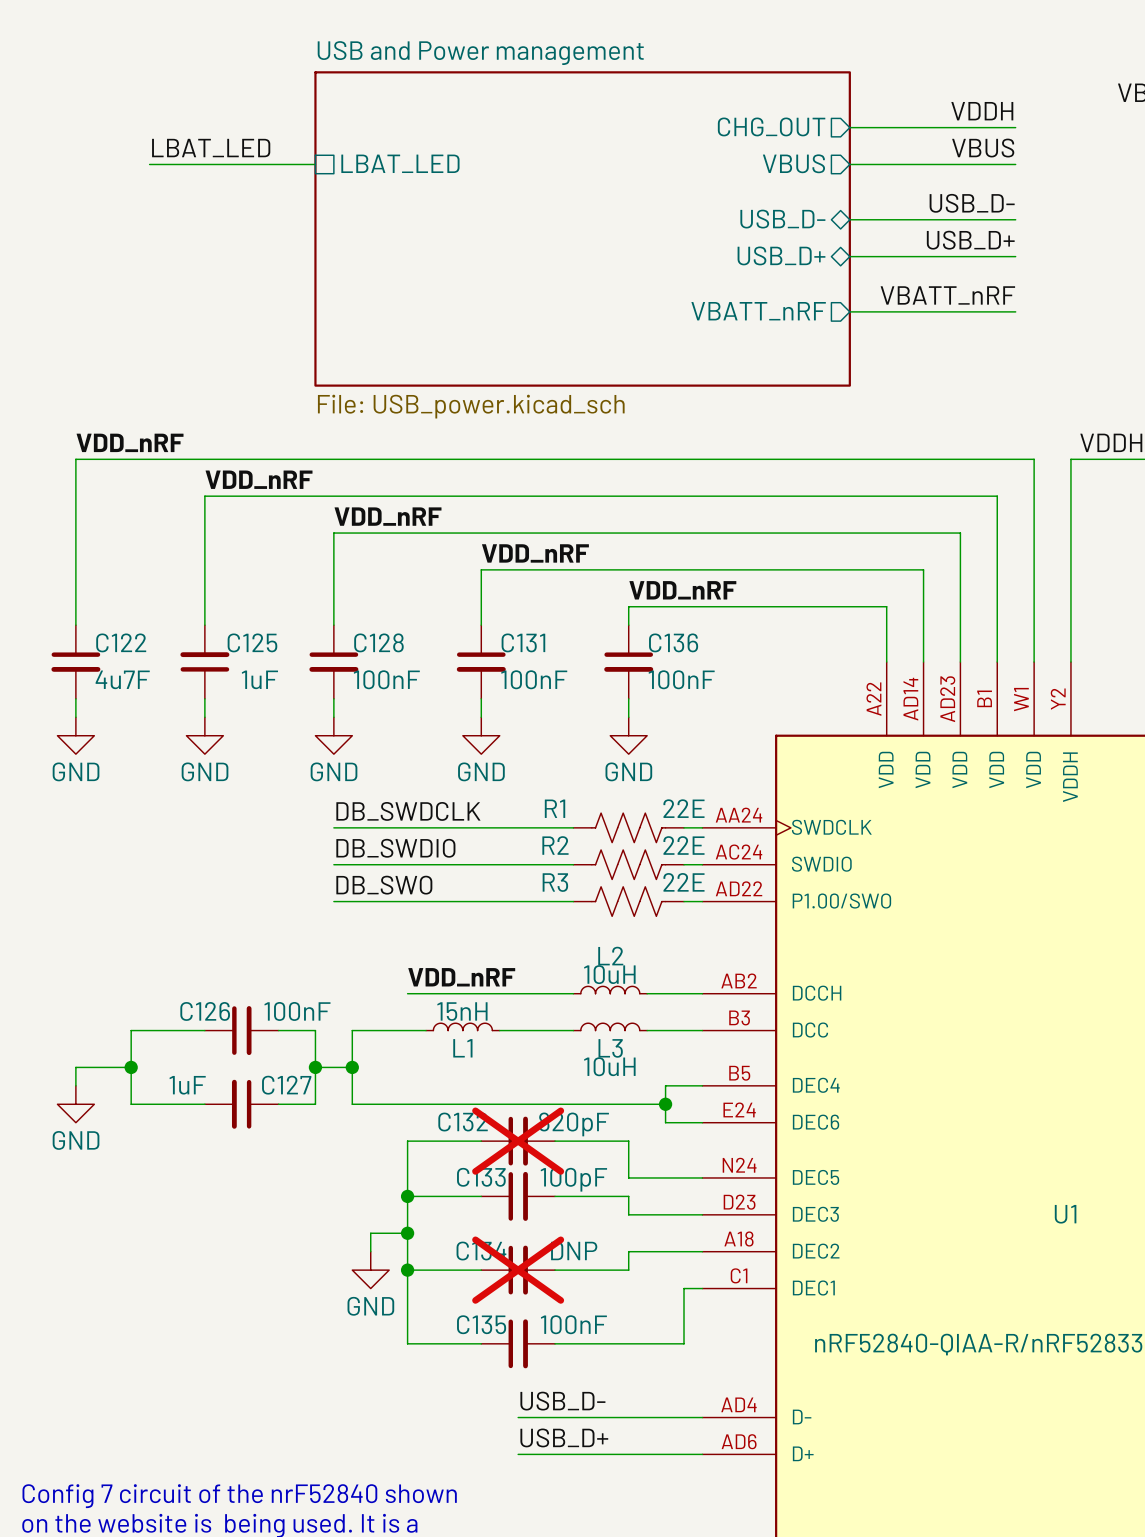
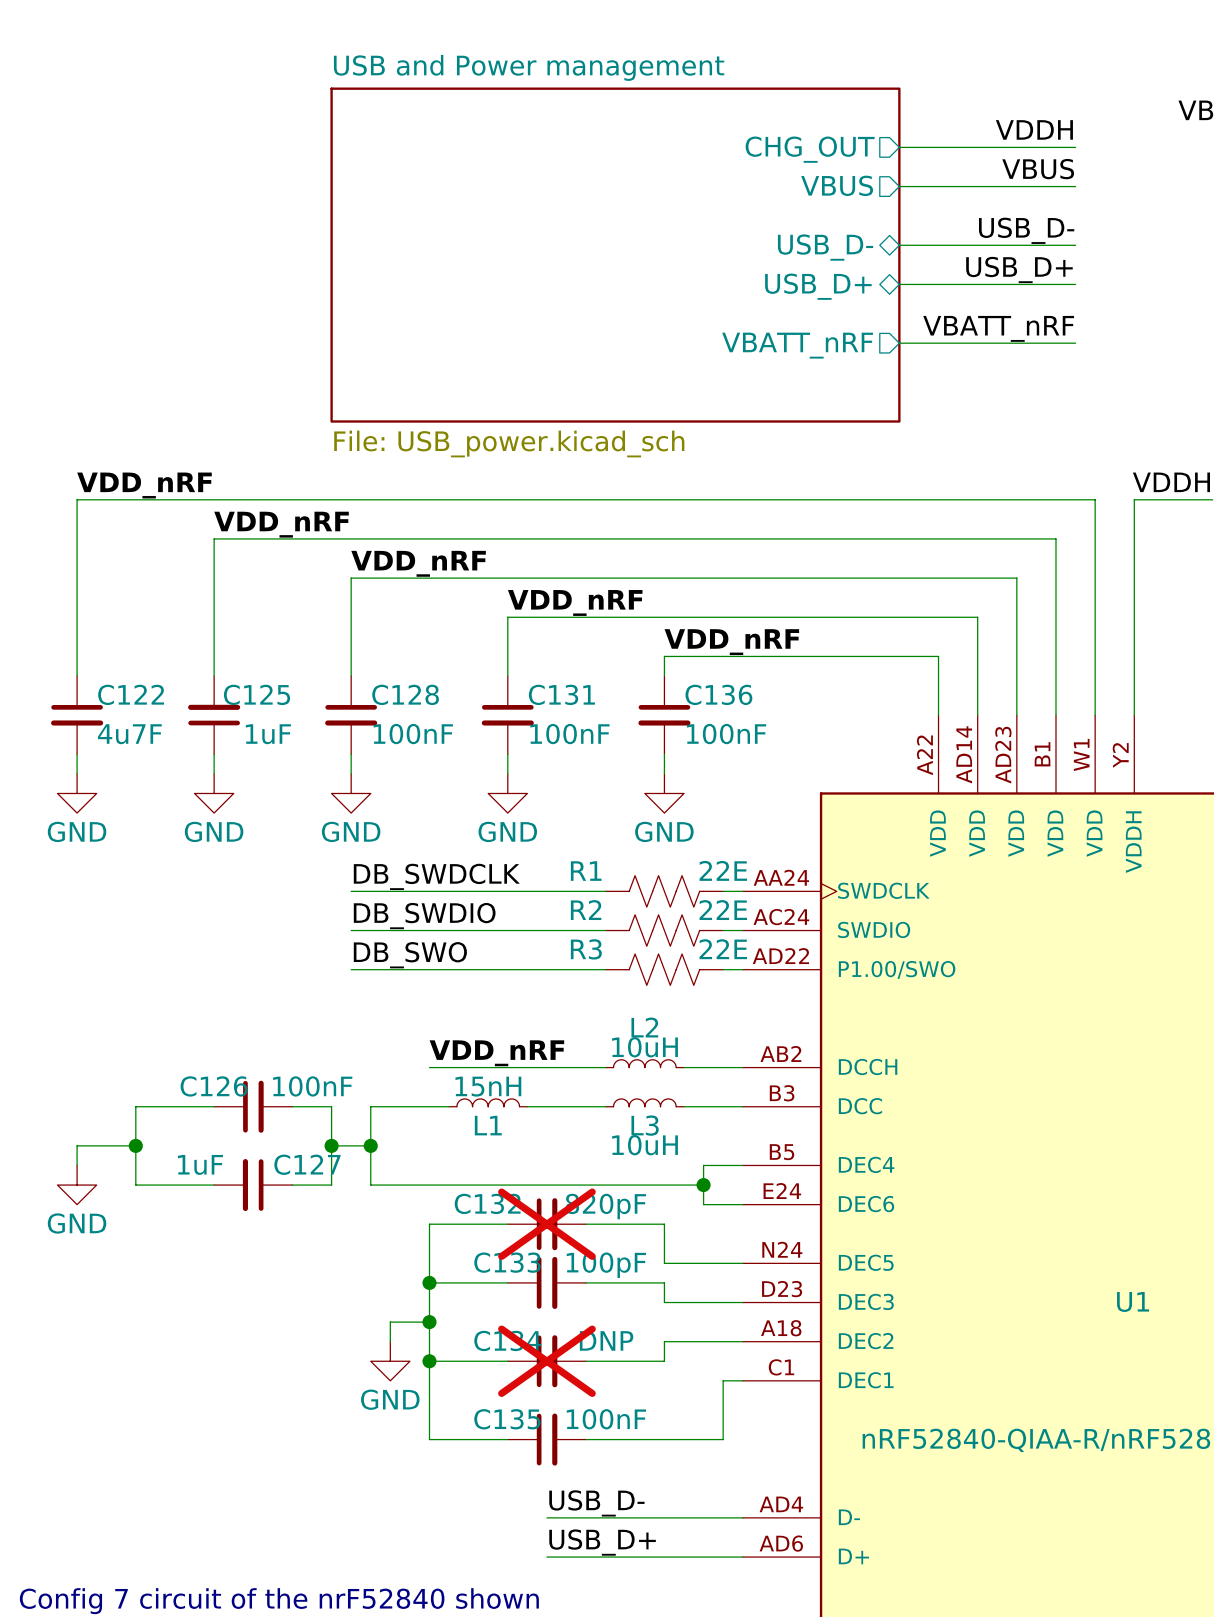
label: LBAT_LED (211, 148) -> none
sheet pin: LBAT_LED (400, 163) -> none
wire: (149, 164) (315, 164) -> none

